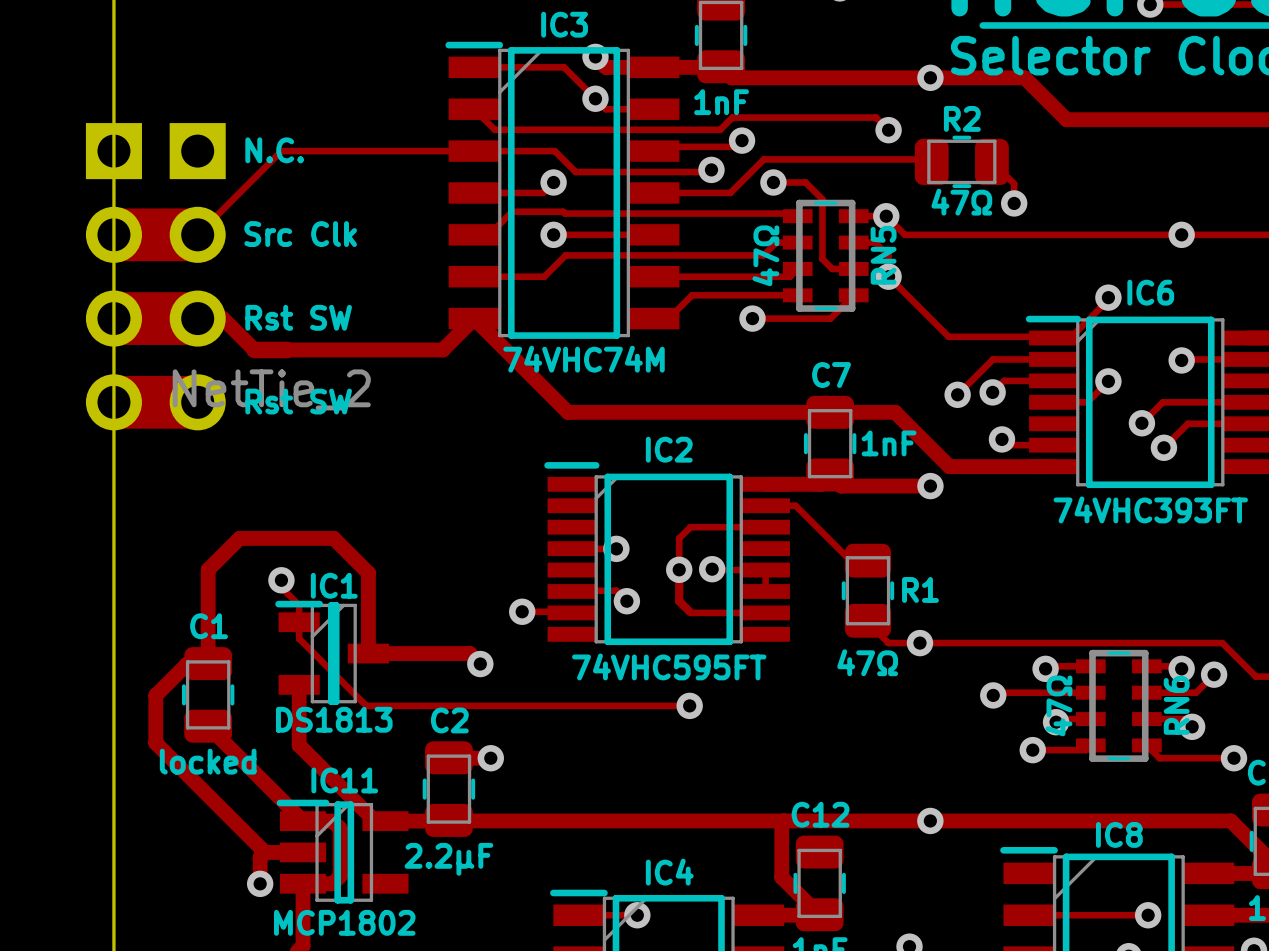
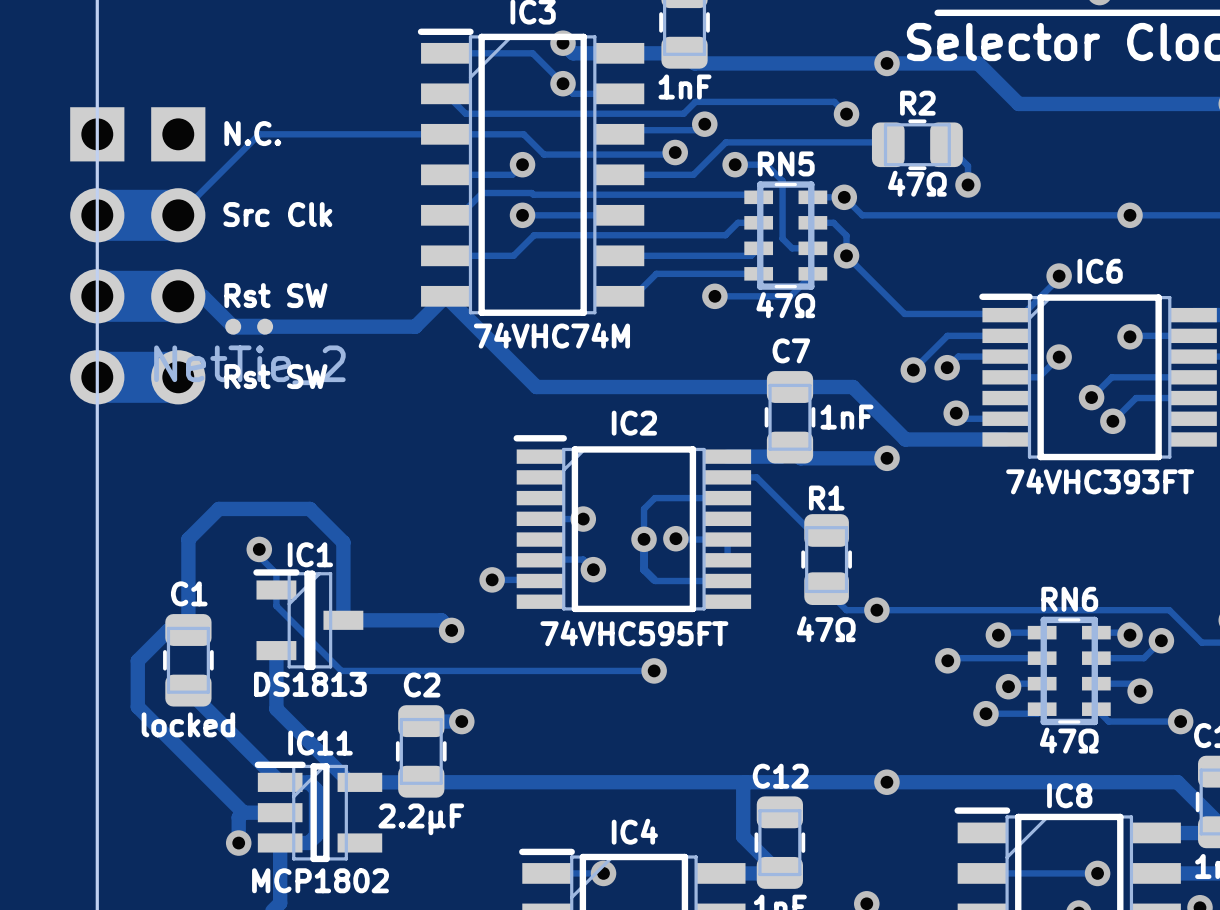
RN5 text rotation: 0° (765, 255) -> 90° clockwise (785, 305)
RN5 text position: 47Ω (765, 255) -> 47Ω (785, 305)
RN5 name rotation: 0° (883, 255) -> 90° clockwise (786, 163)
RN5 name position: RN5 (883, 255) -> RN5 (786, 163)
R1 name position: R1 (920, 589) -> R1 (826, 498)
RN6 text rotation: 0° (1058, 705) -> 90° clockwise (1069, 740)
RN6 text position: 47Ω (1058, 705) -> 47Ω (1069, 740)
RN6 name rotation: 0° (1176, 705) -> 90° clockwise (1069, 599)
RN6 name position: RN6 (1176, 705) -> RN6 (1069, 599)

